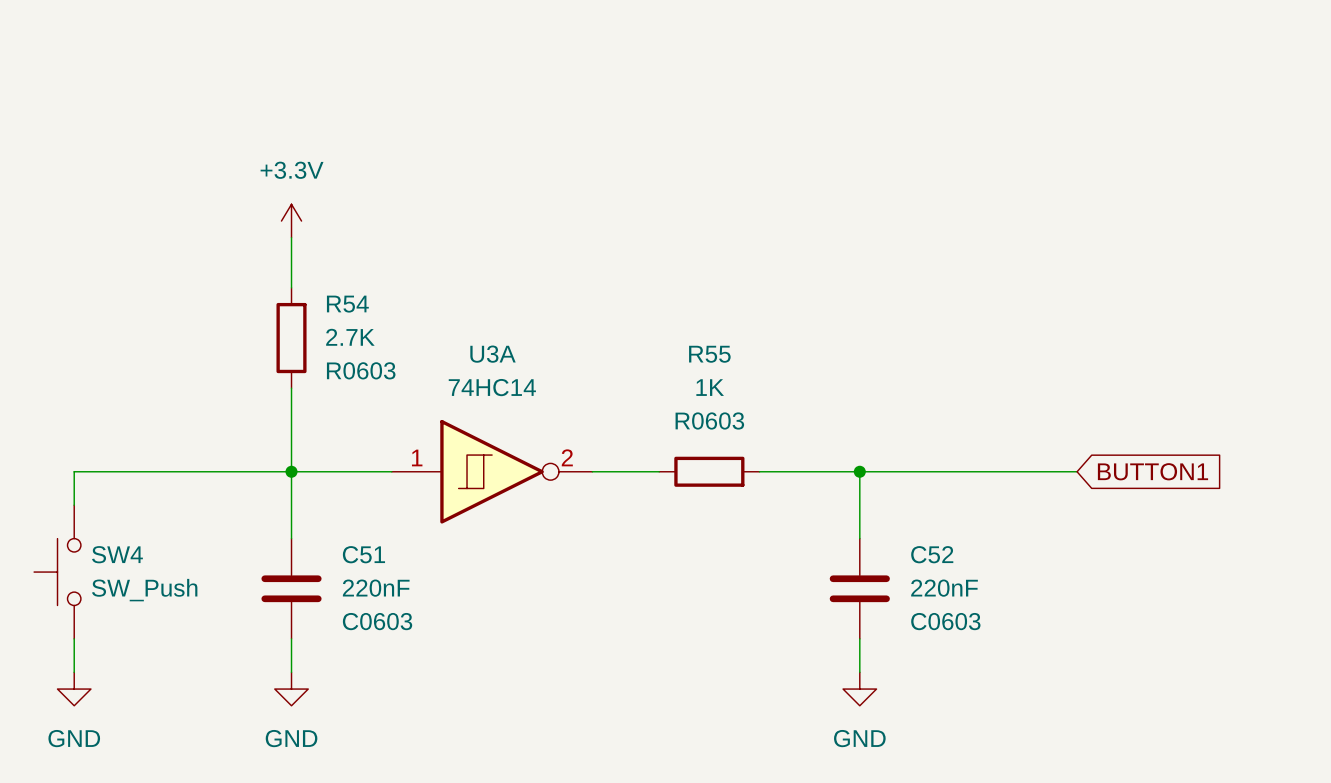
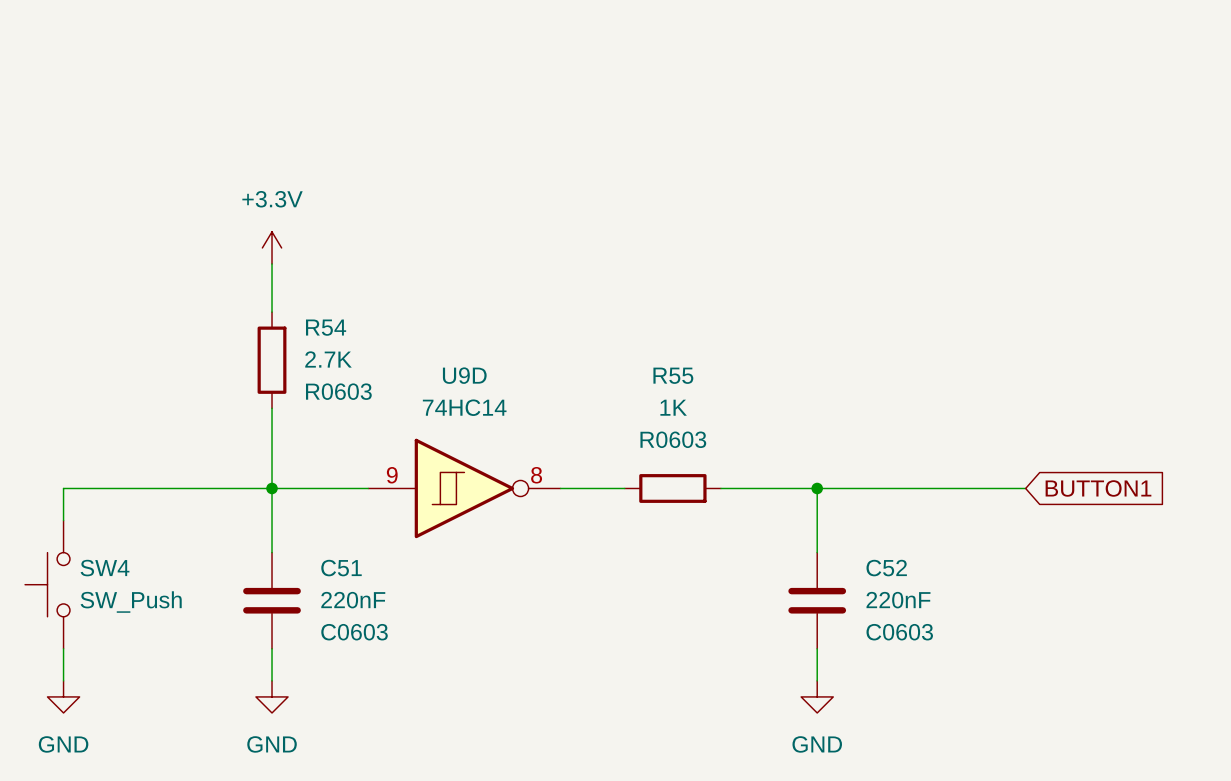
U3A name: U3A (493, 354) -> U9D (464, 375)
U3A pin number: 1 (417, 457) -> 9 (392, 475)
U3A pin number: 2 (567, 457) -> 8 (536, 475)

